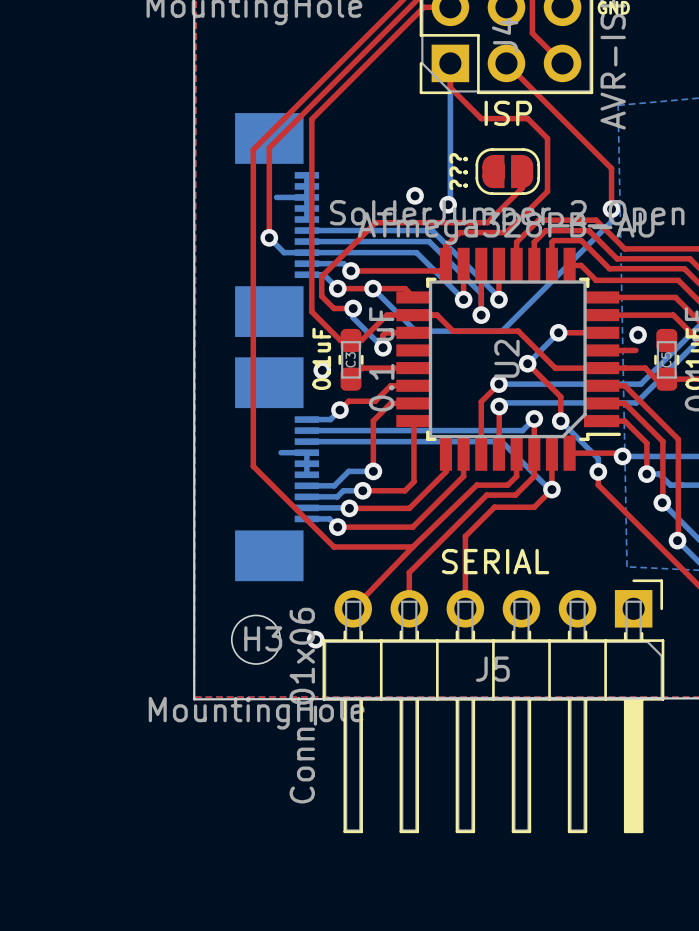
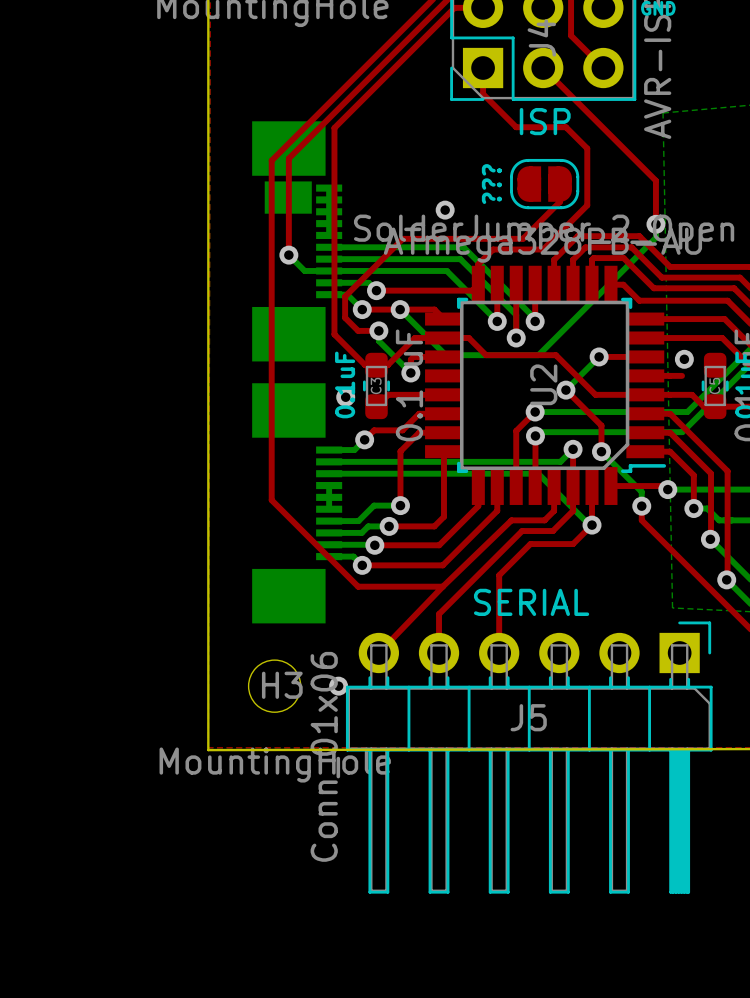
bottom track: (450, 63) (450, 202) (448, 204) -> none
part footprint: [235, 113, 319, 337] -> [252, 121, 343, 362]
bottom track: (276, 197) (306, 197) -> none
via: (448, 204) -> none
bottom track: (281, 452) (306, 452) -> none

